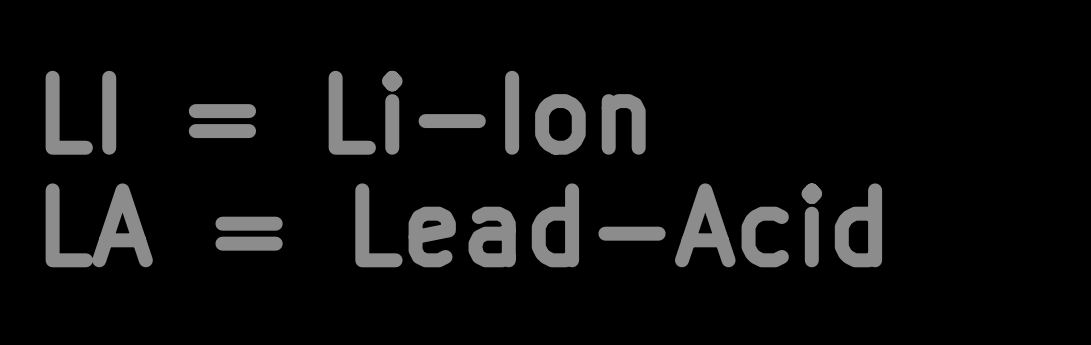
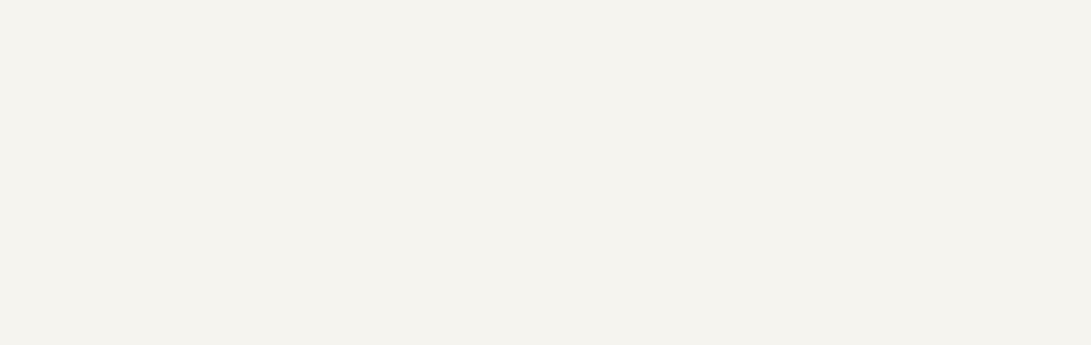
text: LI = Li-Ion (345, 112) -> none
text: LA = Lead-Acid (463, 225) -> none

